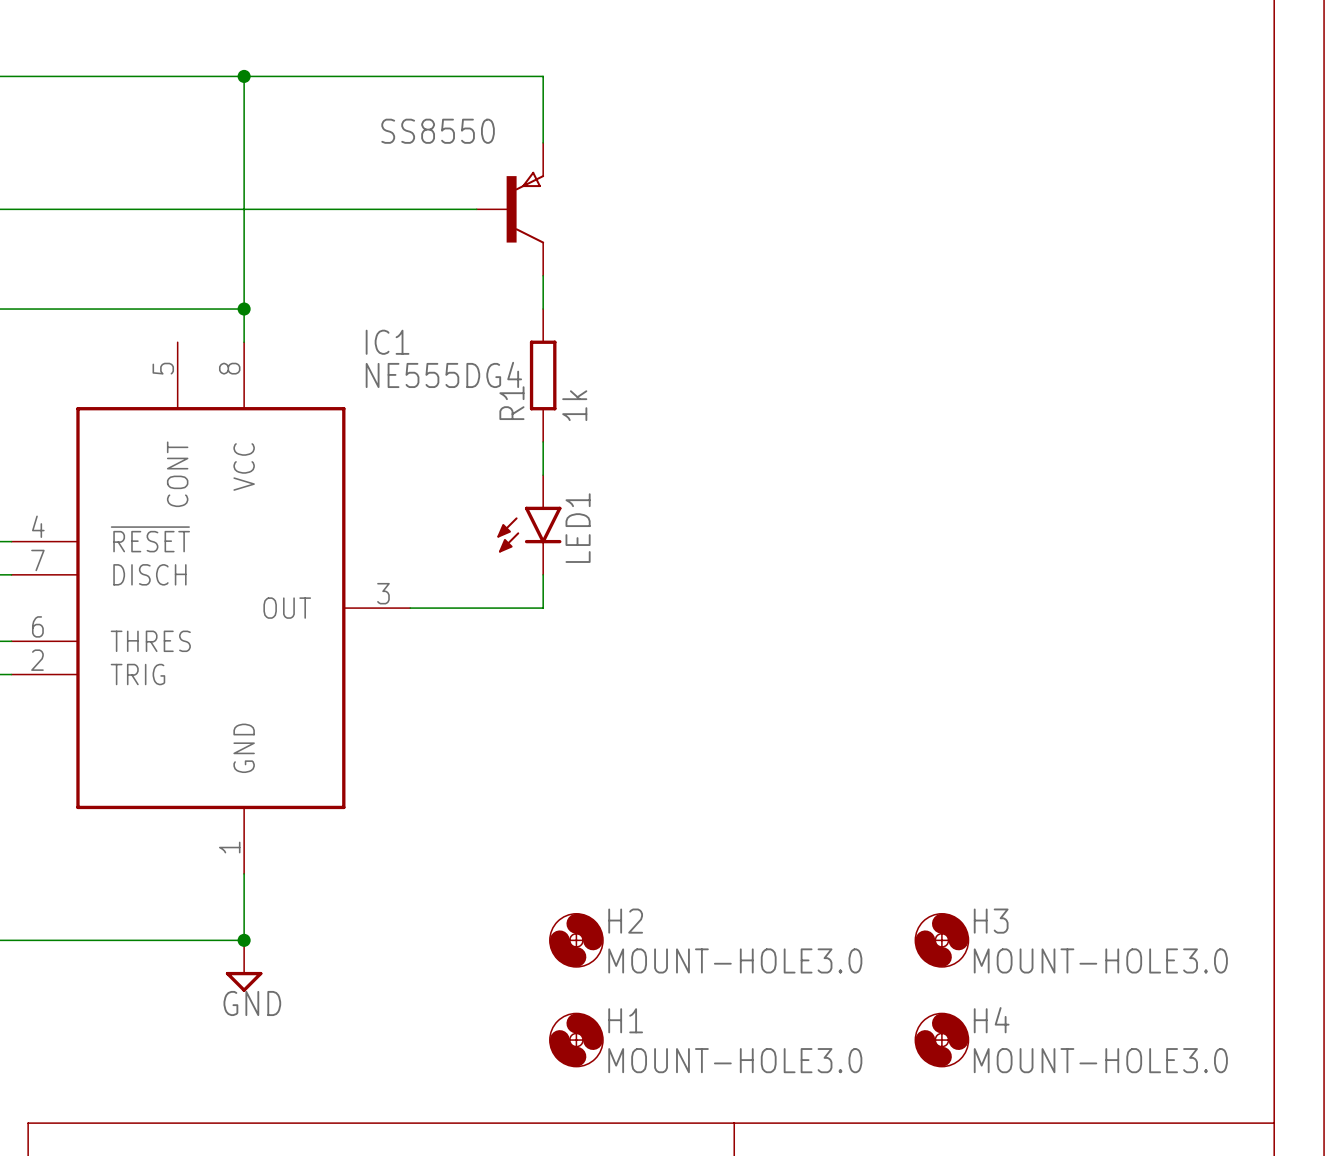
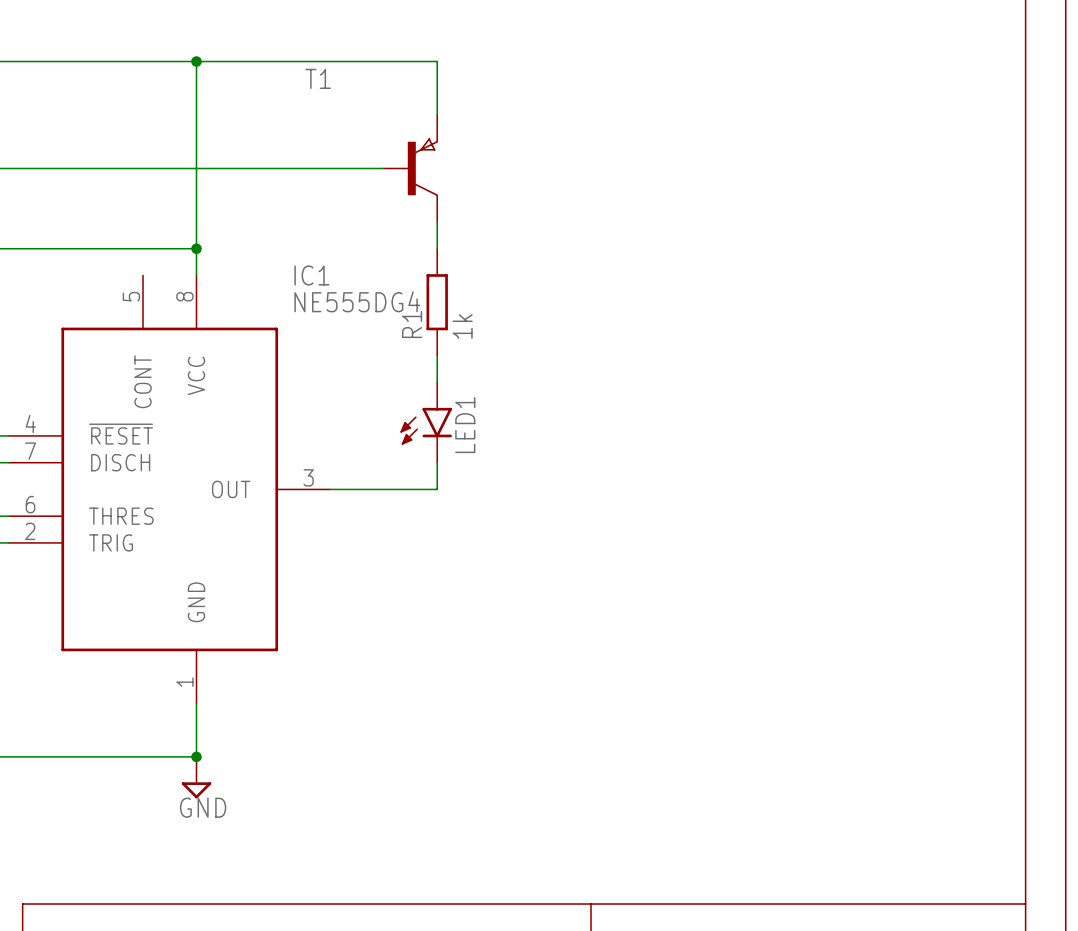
SS8550 name: SS8550 (438, 131) -> T1 (318, 78)
H2: MOUNT-HOLE3.0 (576, 940) -> none
H3: MOUNT-HOLE3.0 (941, 940) -> none
H1: MOUNT-HOLE3.0 (576, 1040) -> none
H4: MOUNT-HOLE3.0 (941, 1040) -> none

